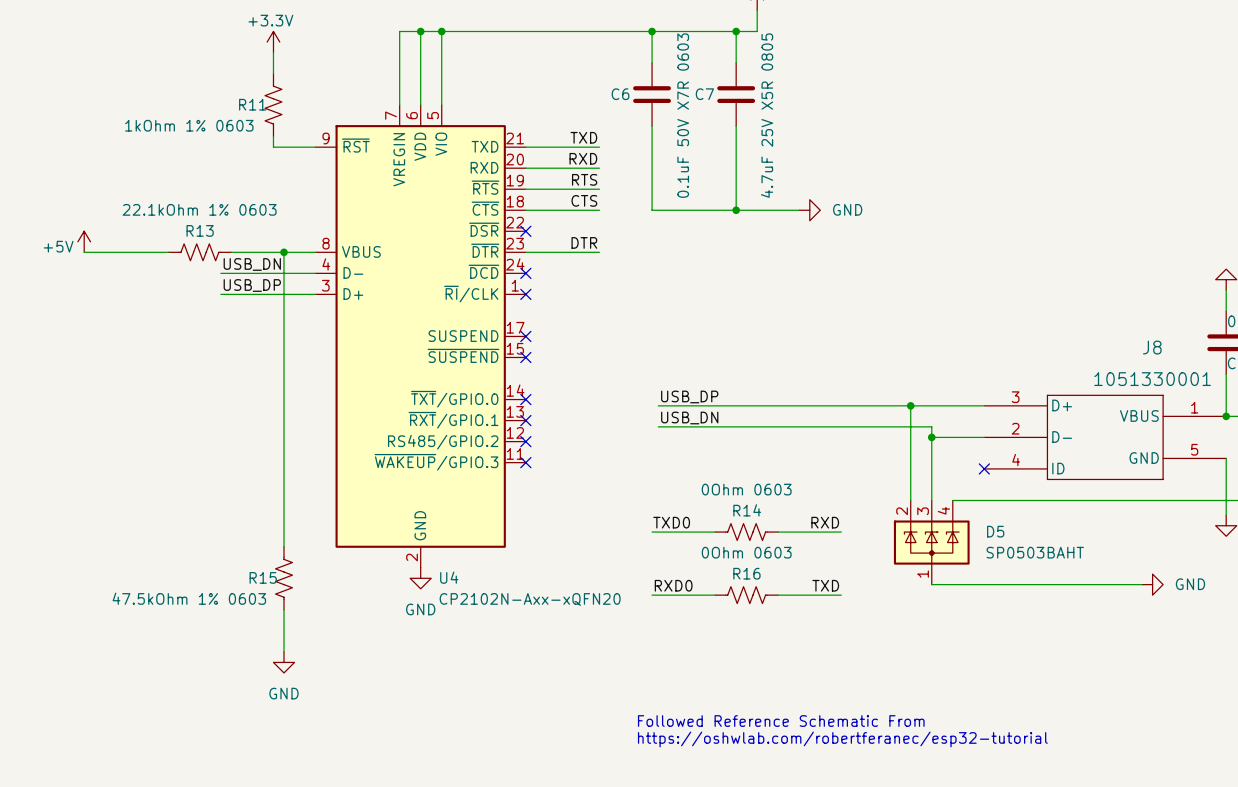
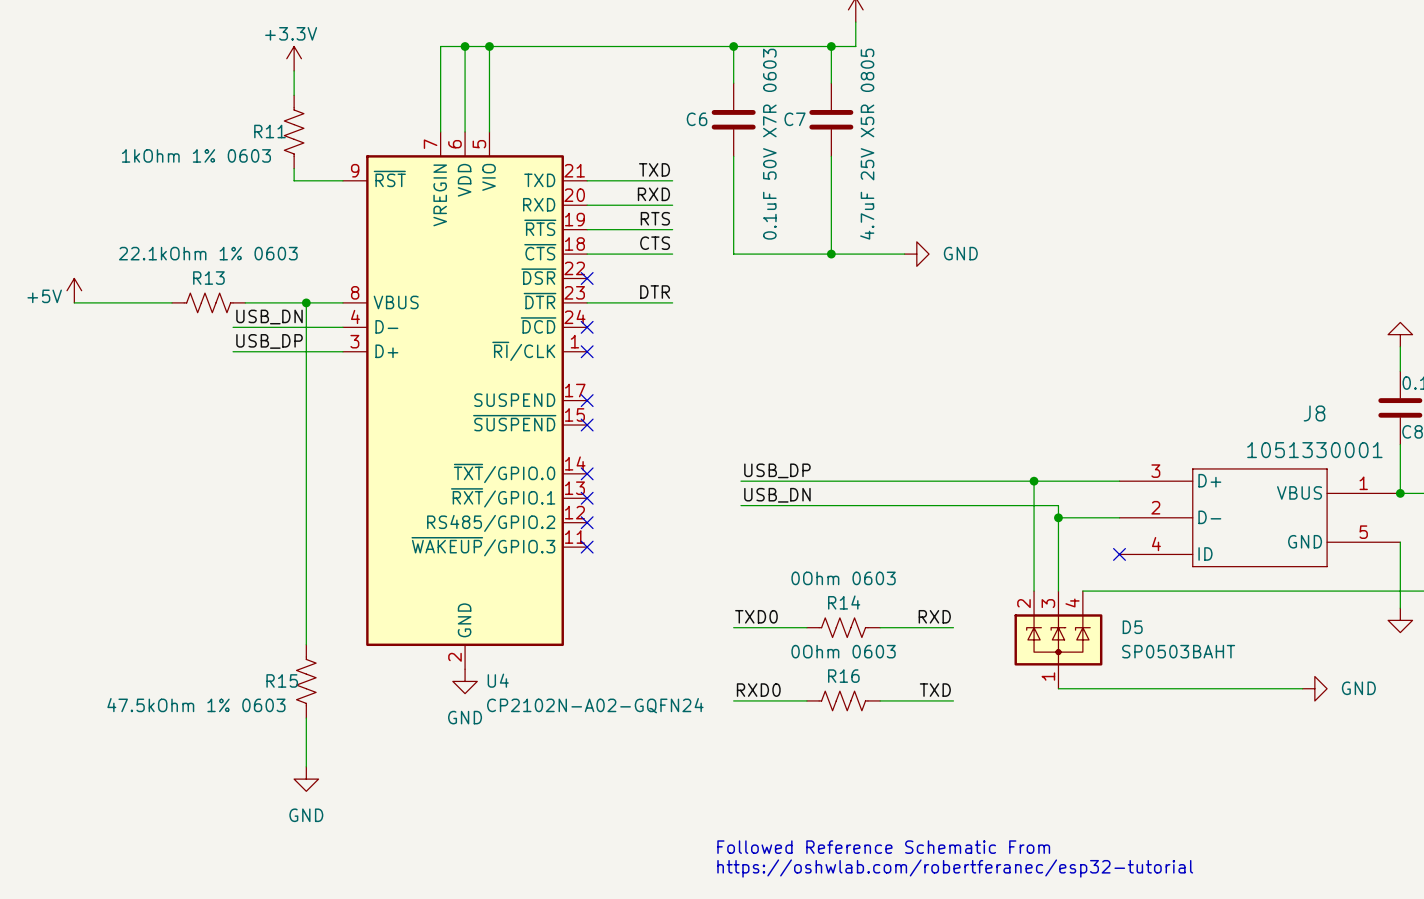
U4 value: CP2102N-Axx-xQFN20 (530, 599) -> CP2102N-A02-GQFN24 (595, 705)

